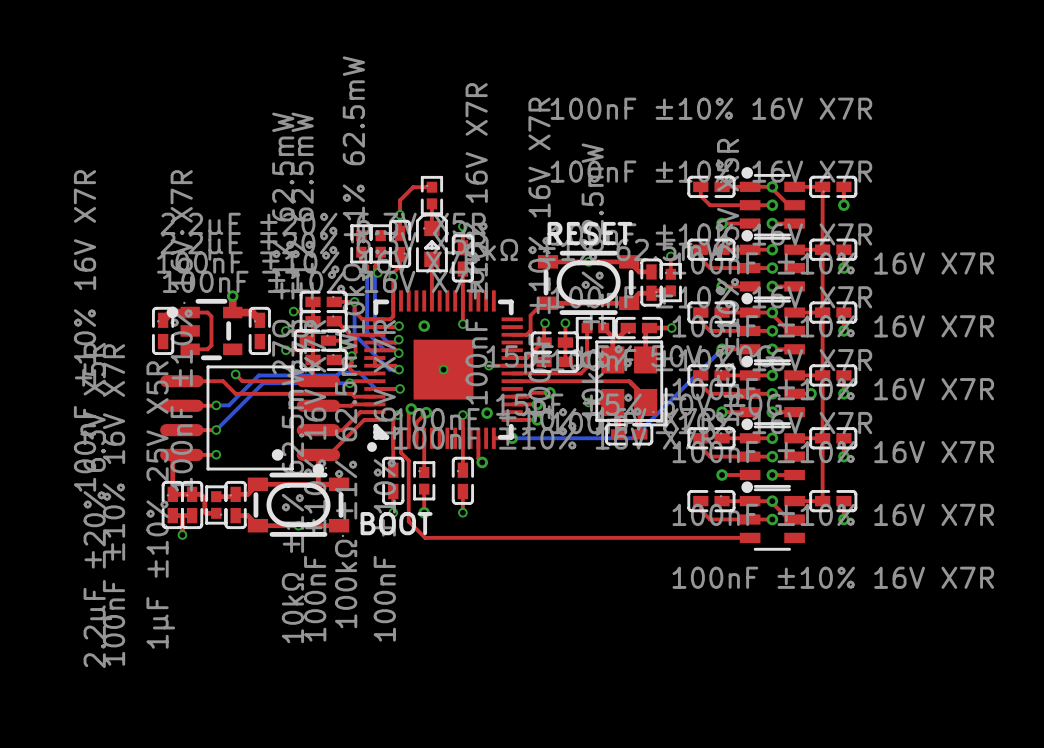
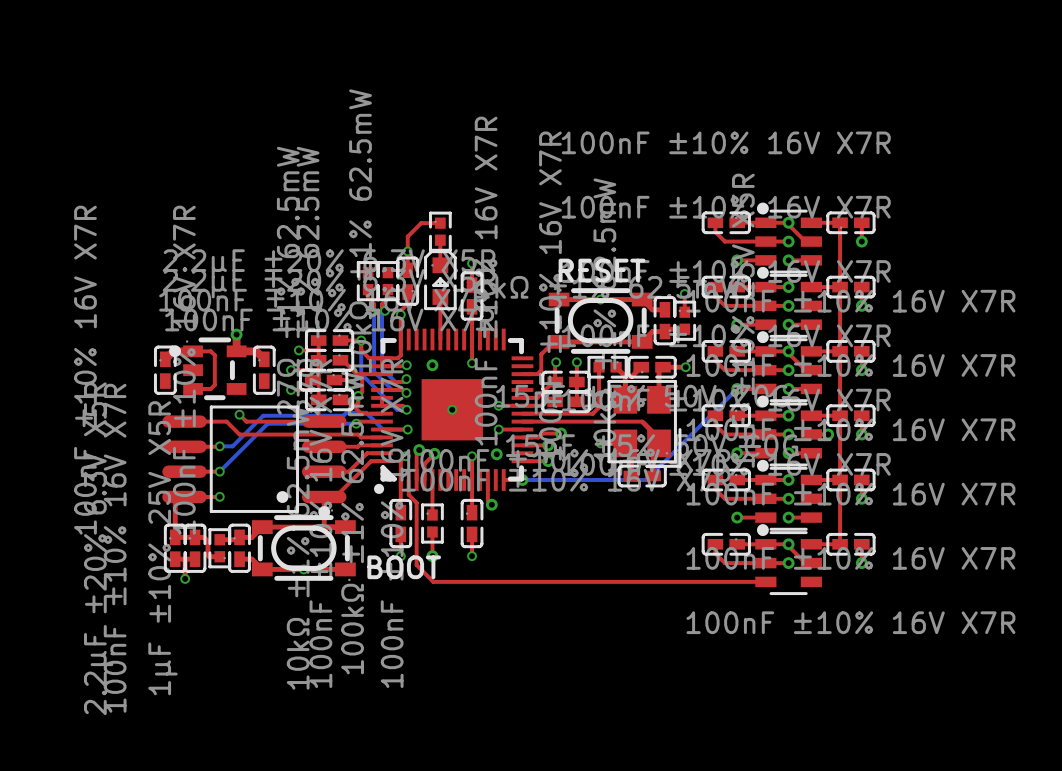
top track: none -> (498, 429) (522, 429)
via: none -> (498, 429)

